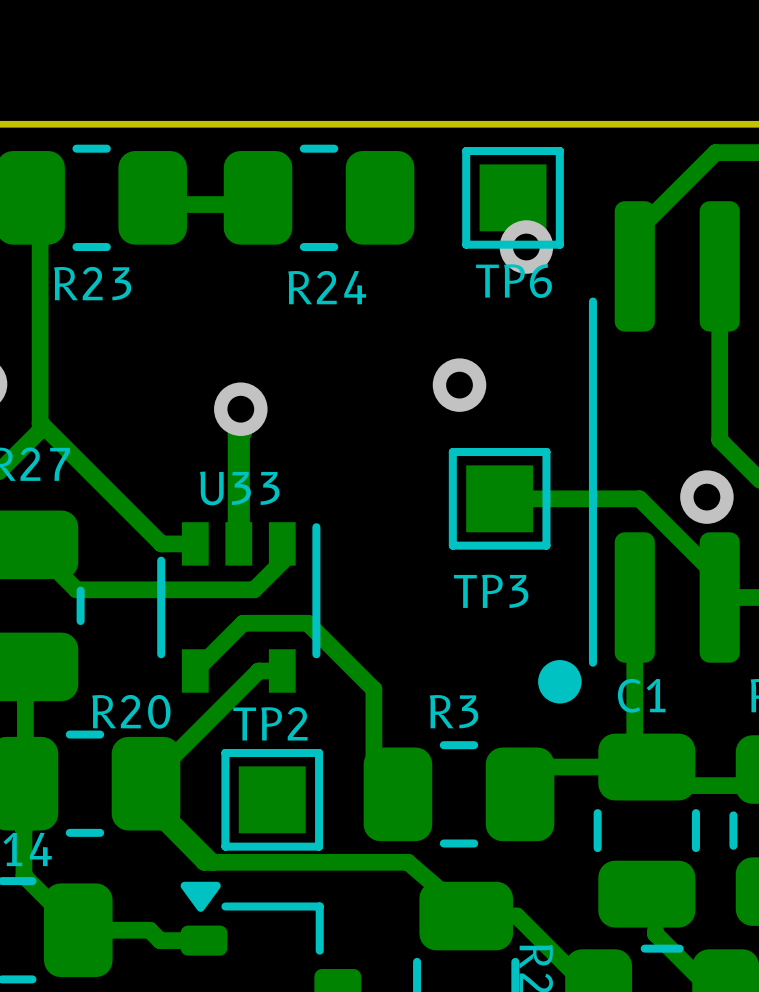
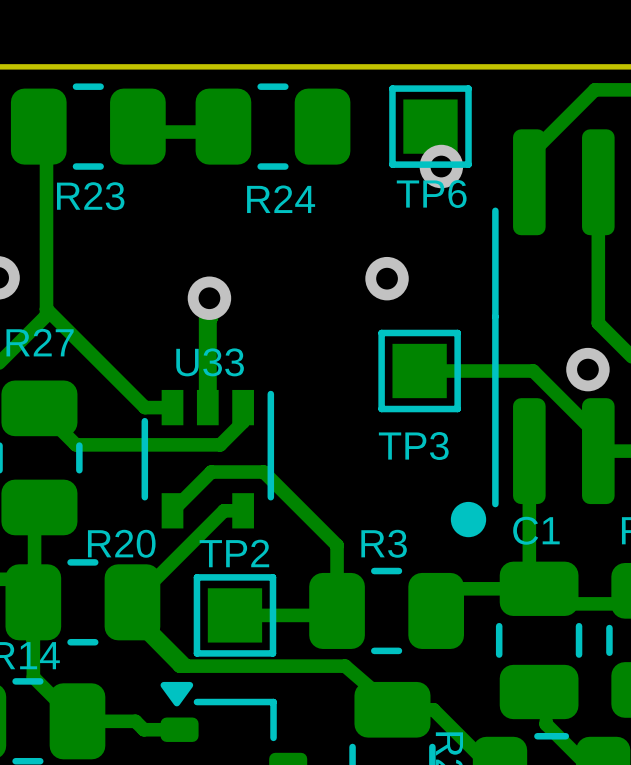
track: (373, 689) (373, 783) -> (317, 525) (337, 545) (337, 610) (332, 615) (234, 615)

